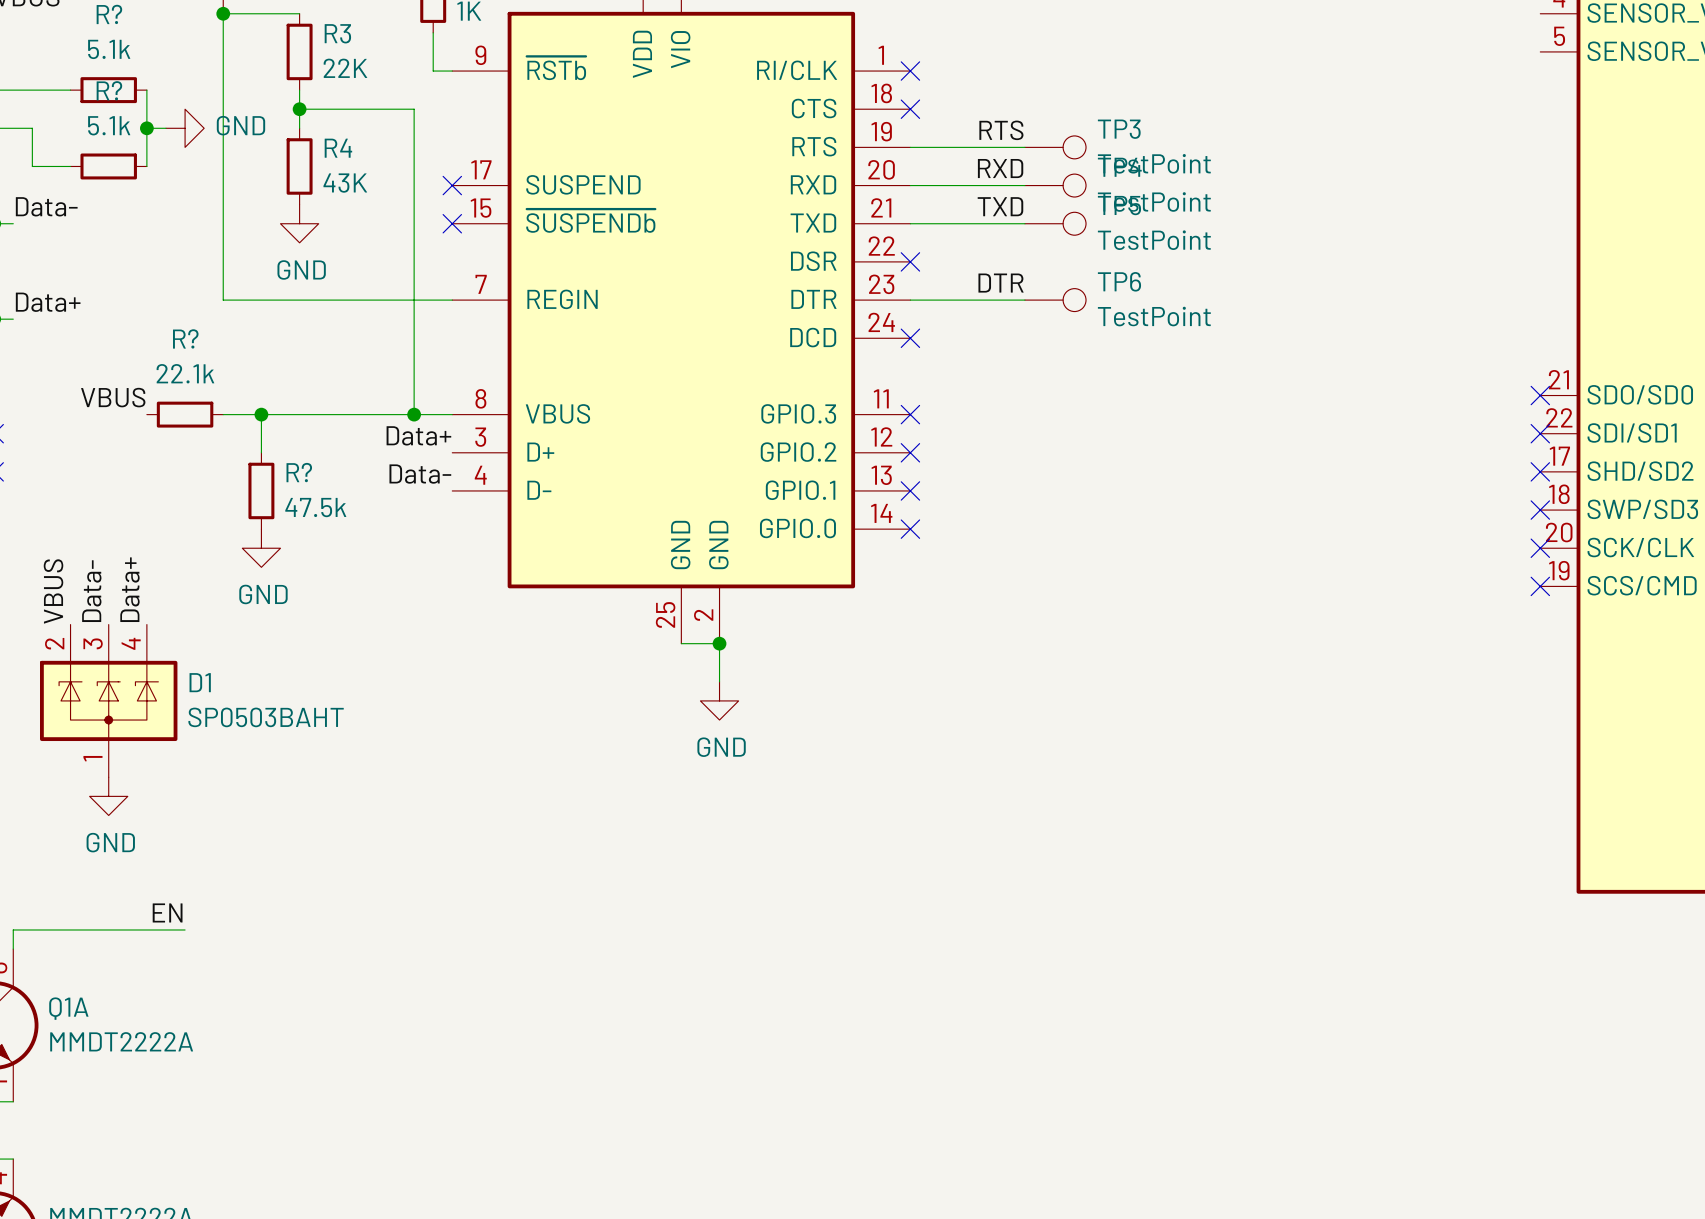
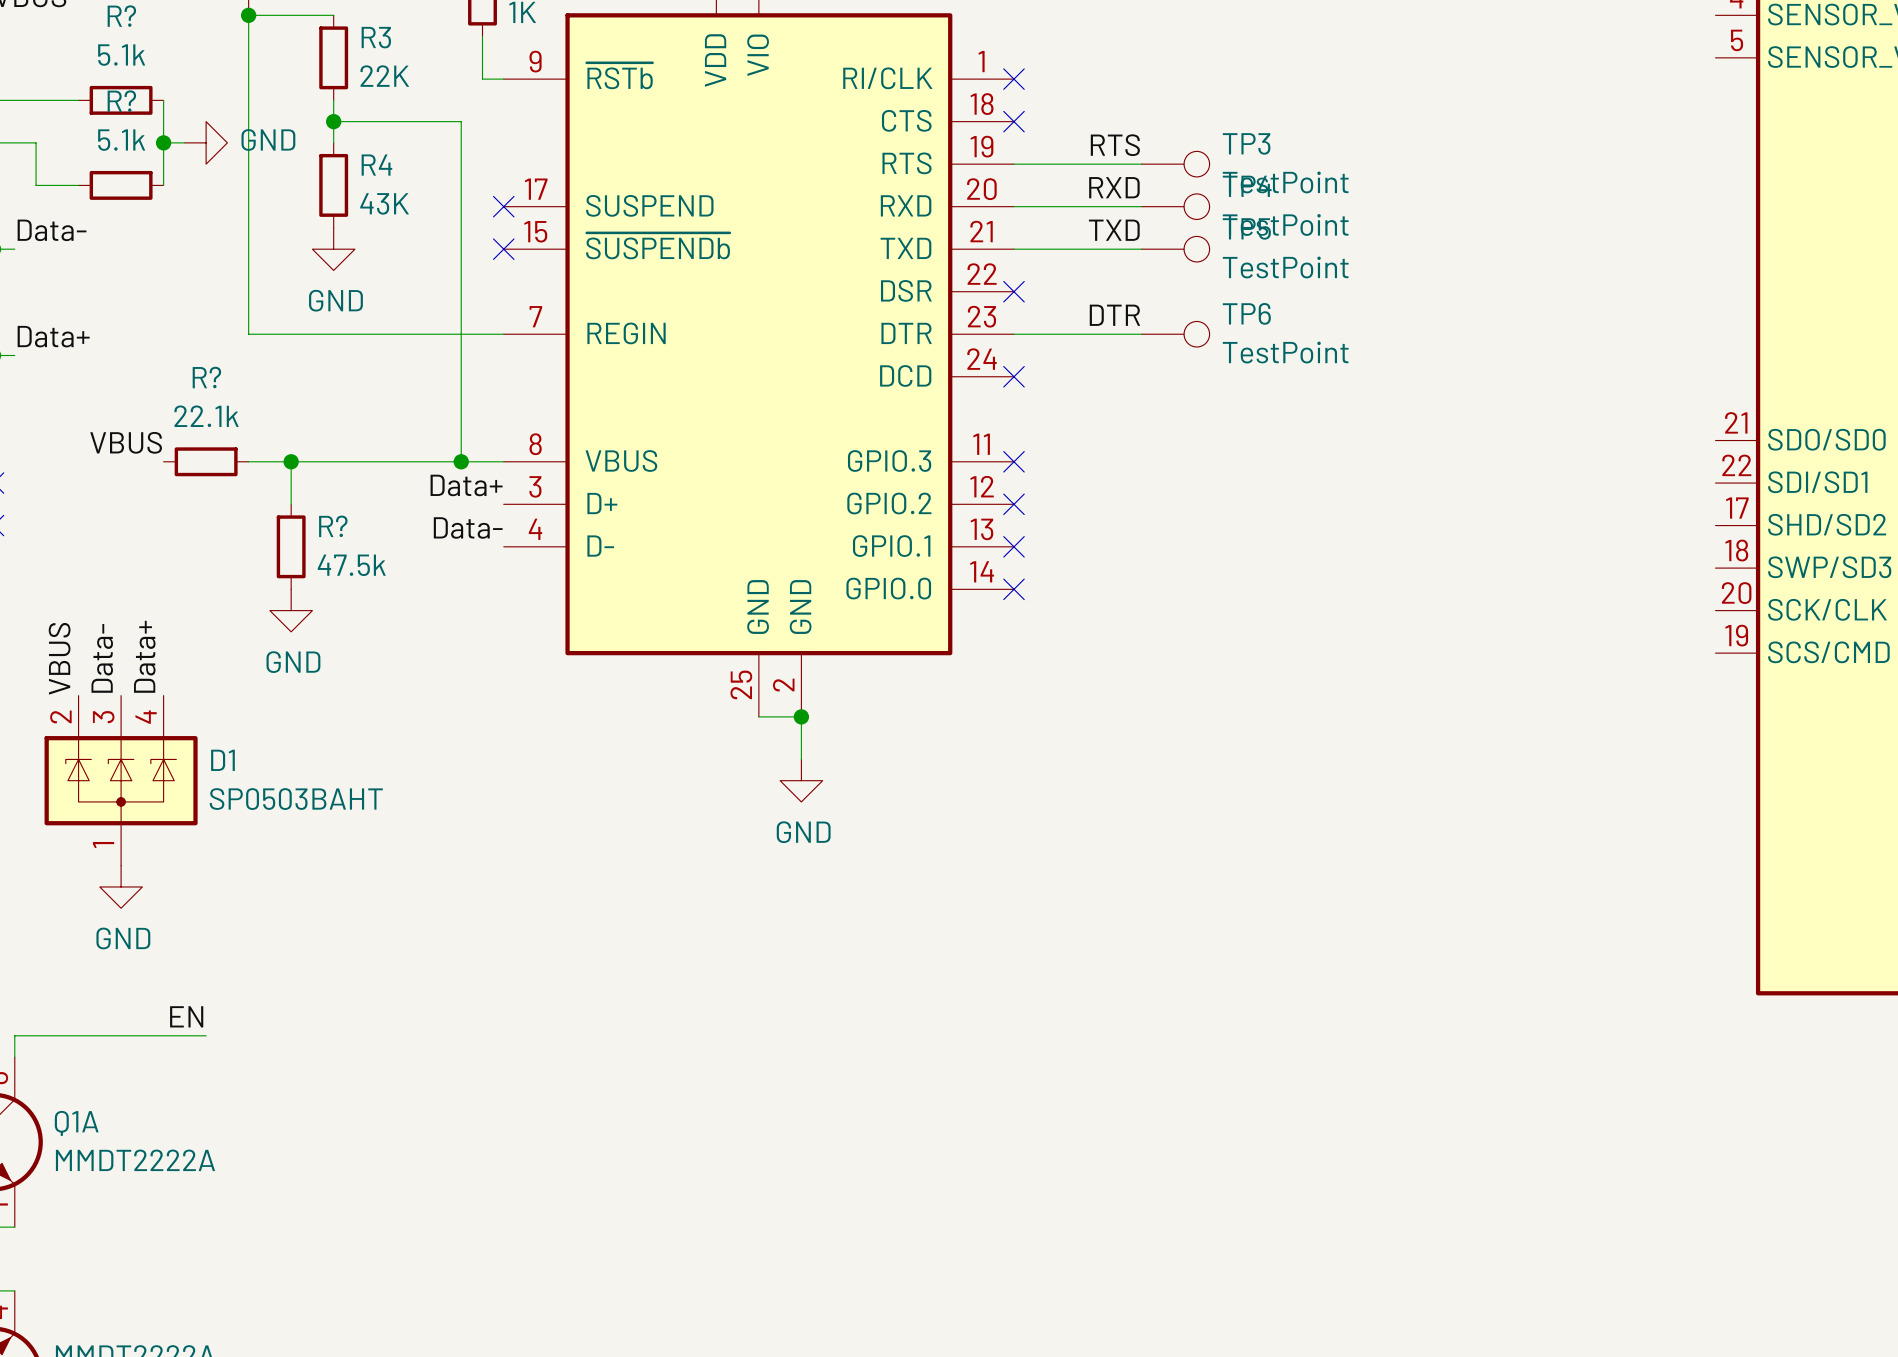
no-connect mark: (1540, 395) -> none
no-connect mark: (1540, 433) -> none
no-connect mark: (1540, 471) -> none
no-connect mark: (1540, 510) -> none
no-connect mark: (1540, 548) -> none
no-connect mark: (1540, 586) -> none

